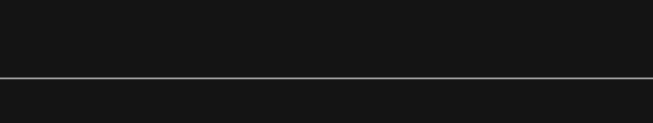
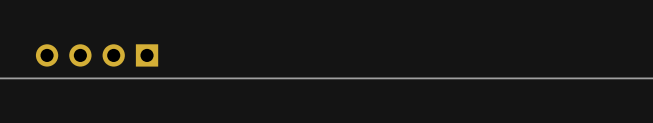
part: none -> (97, 55)

